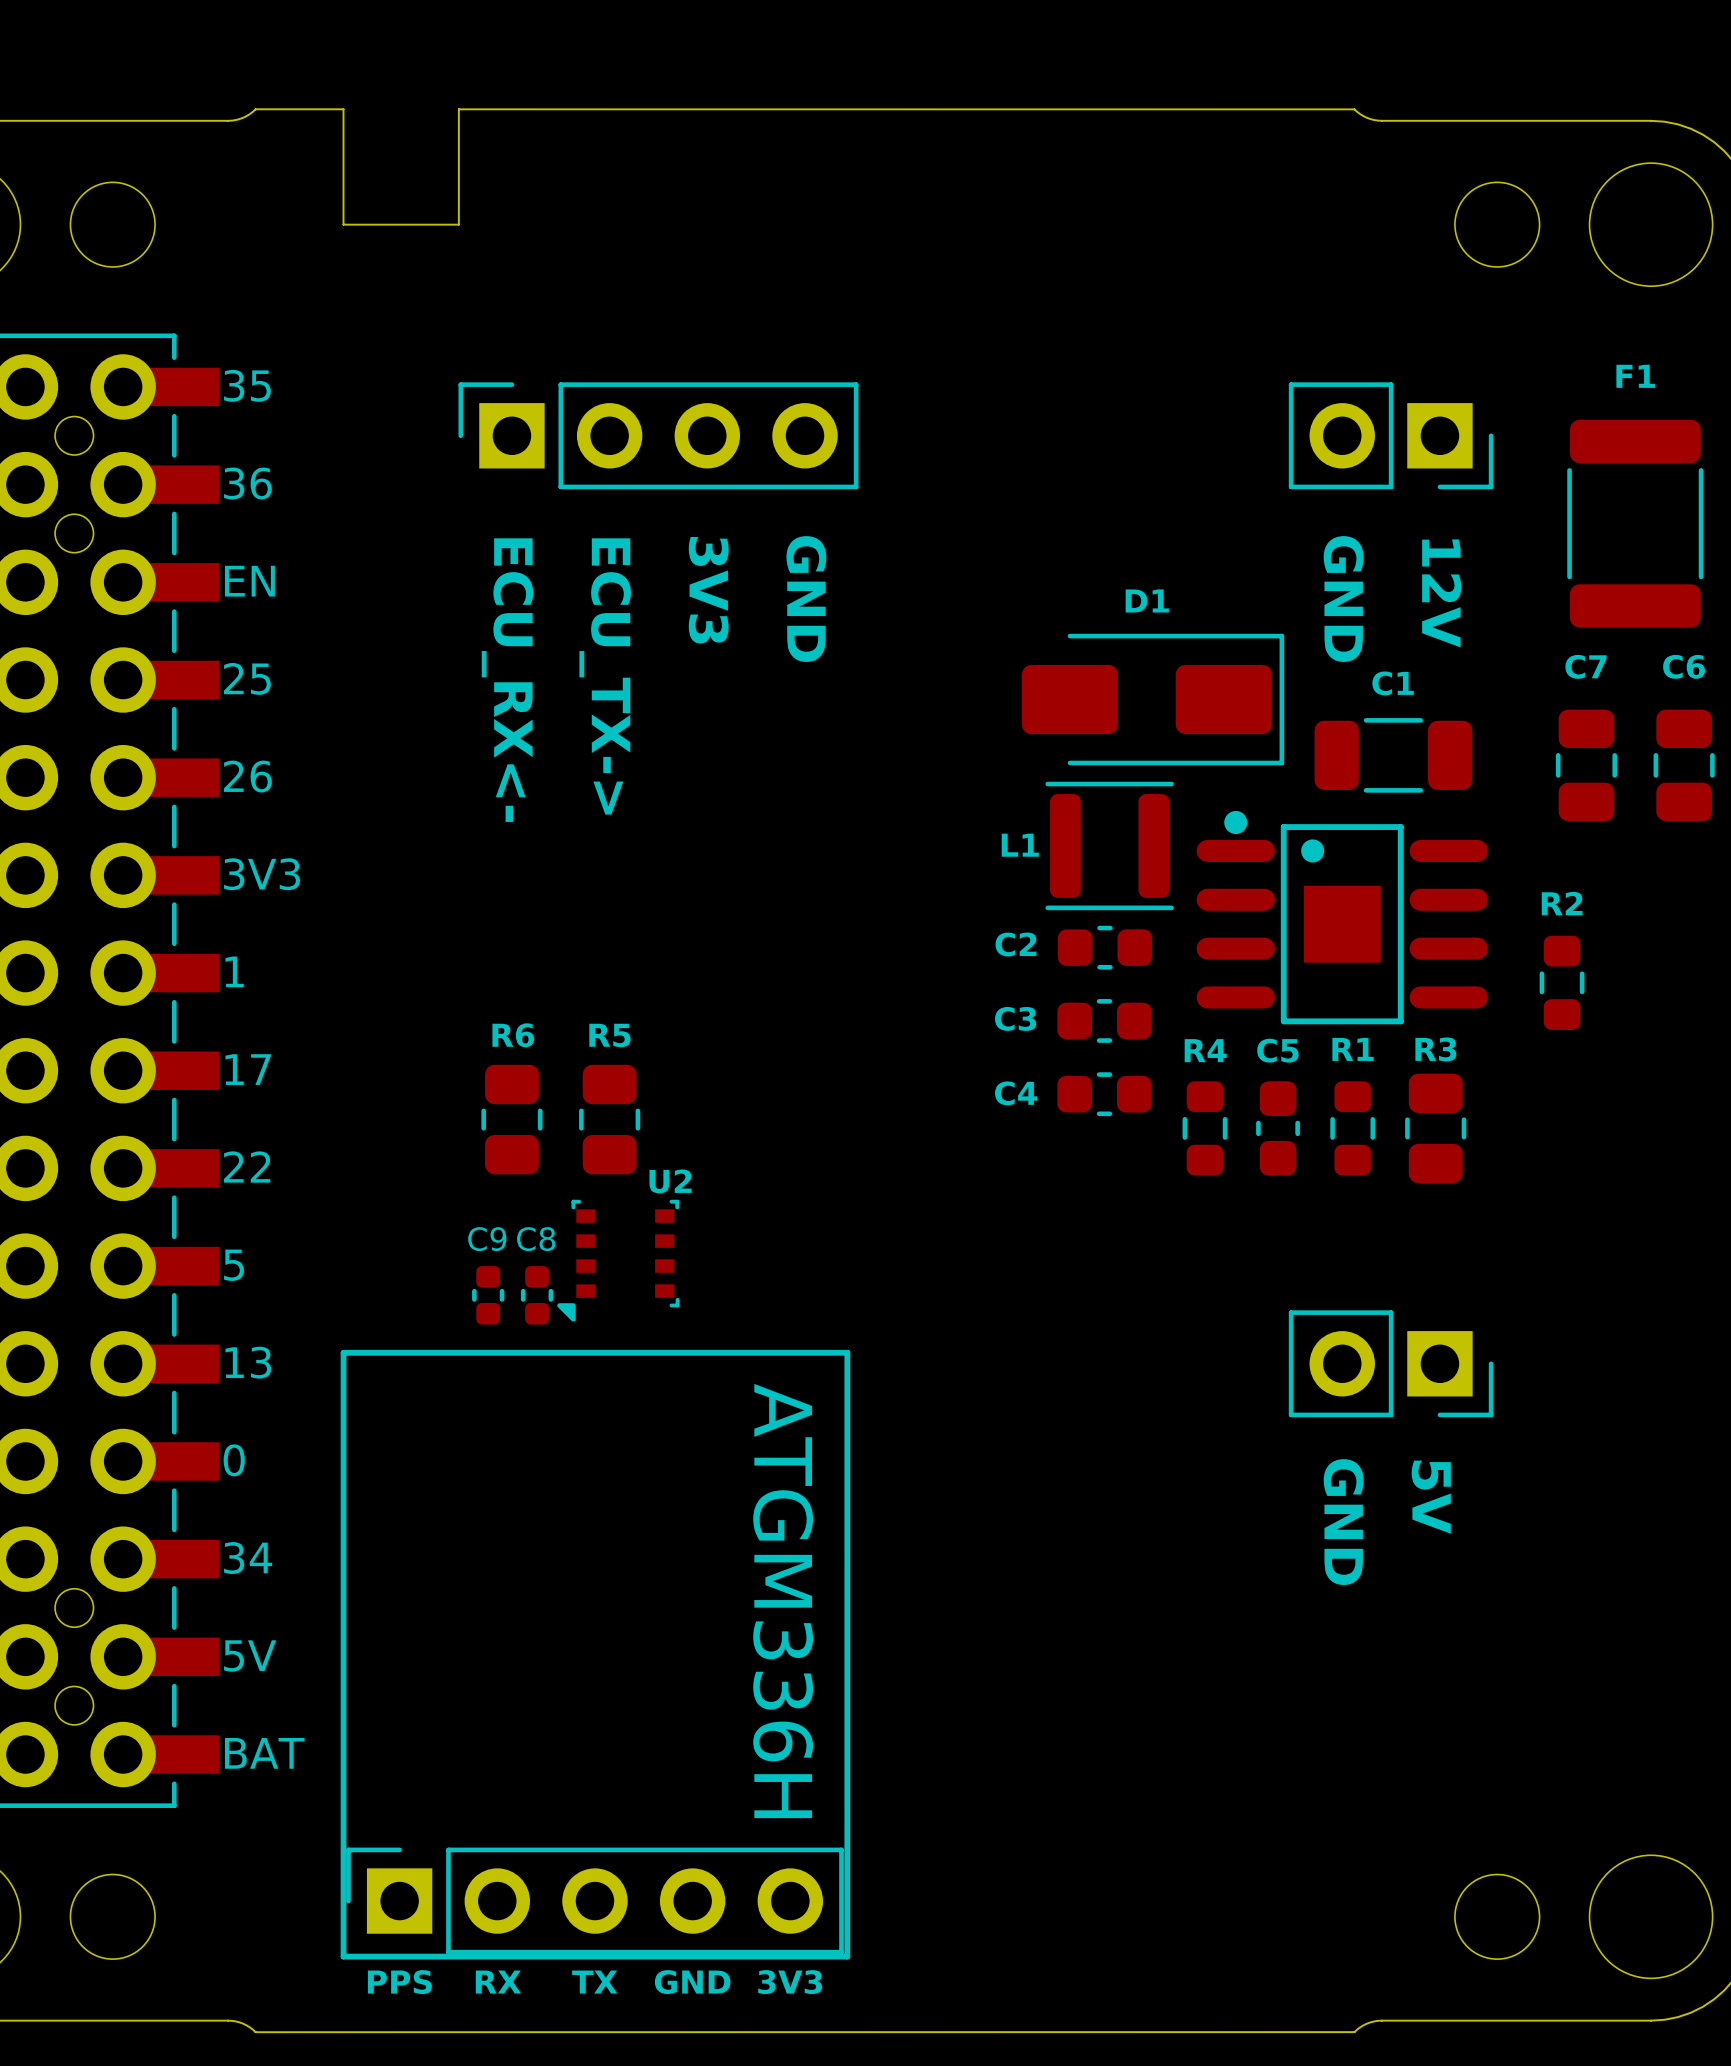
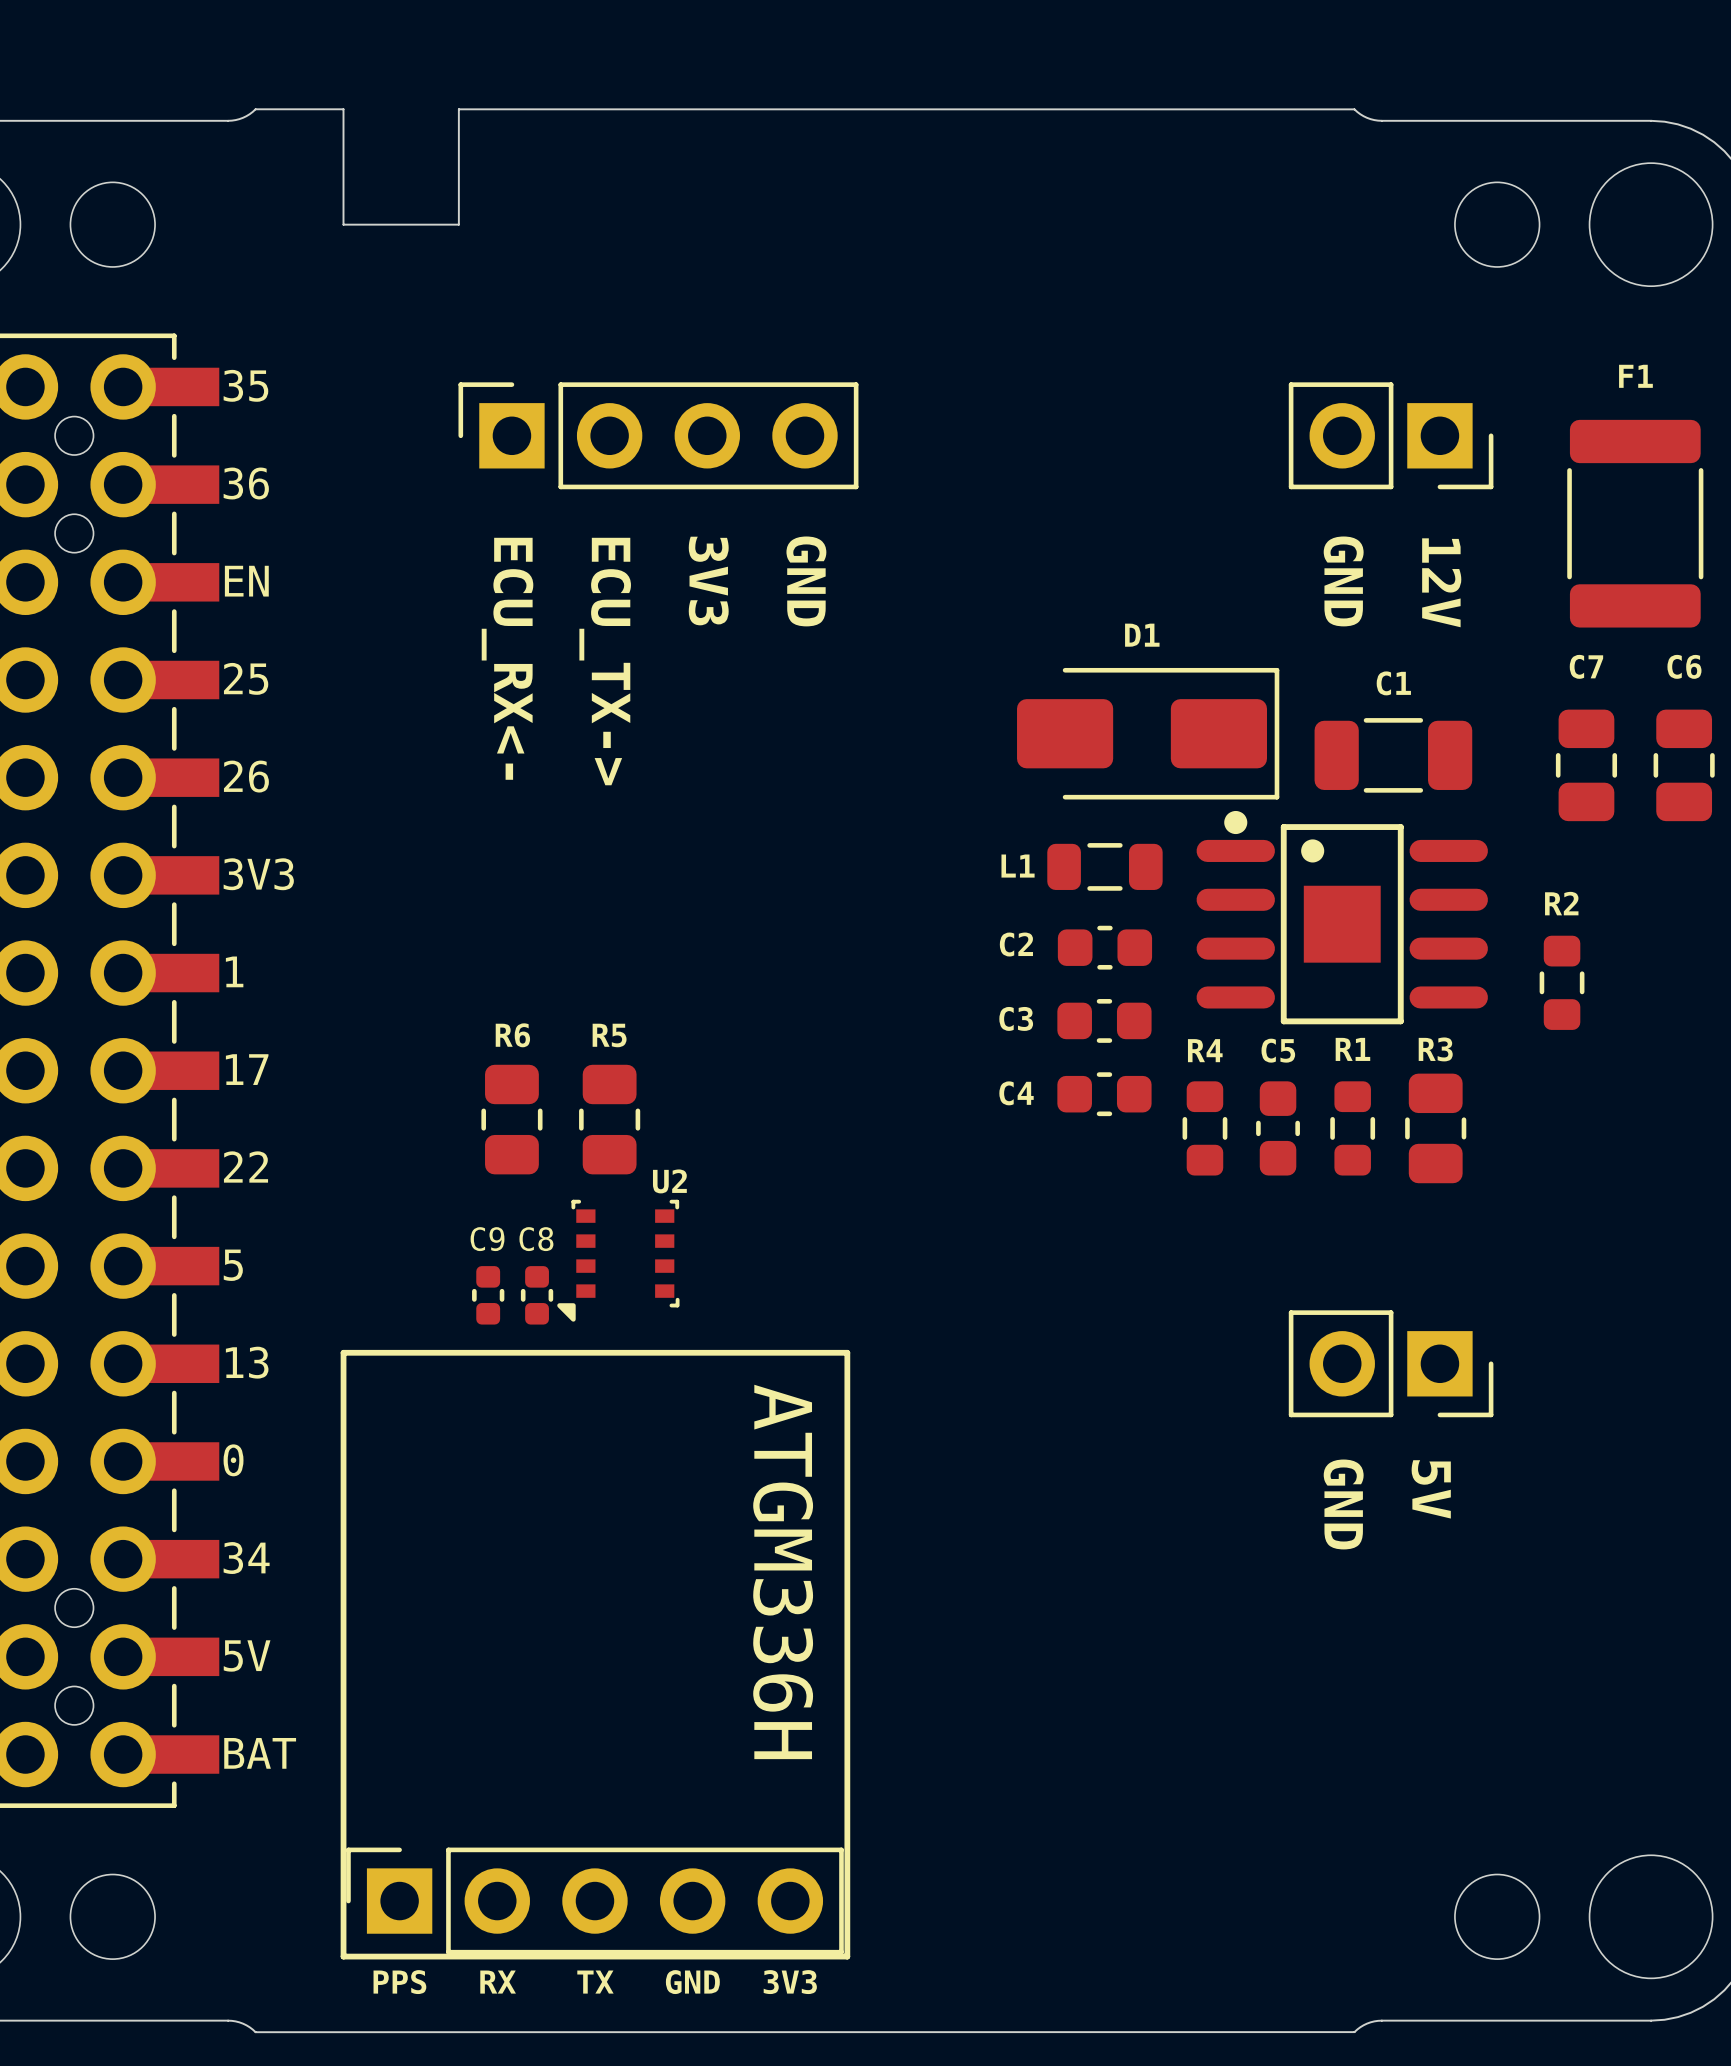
D1 position: (1153, 699) -> (1148, 733)
L1 footprint: [1045, 781, 1174, 911] -> [1047, 843, 1163, 891]

